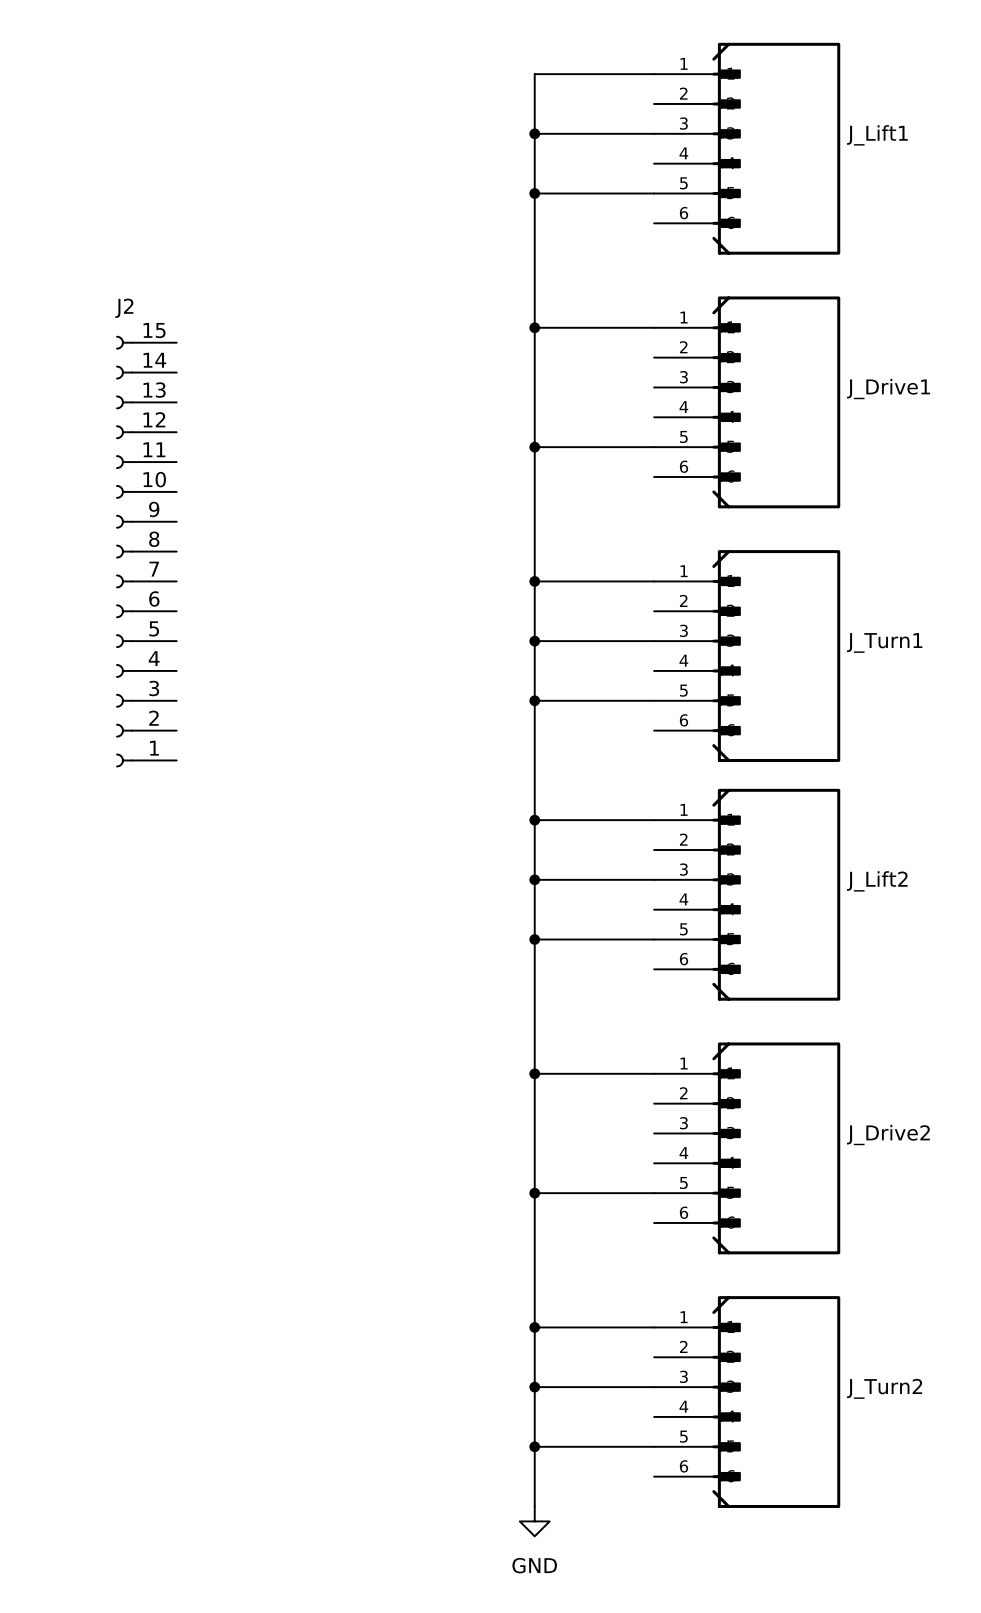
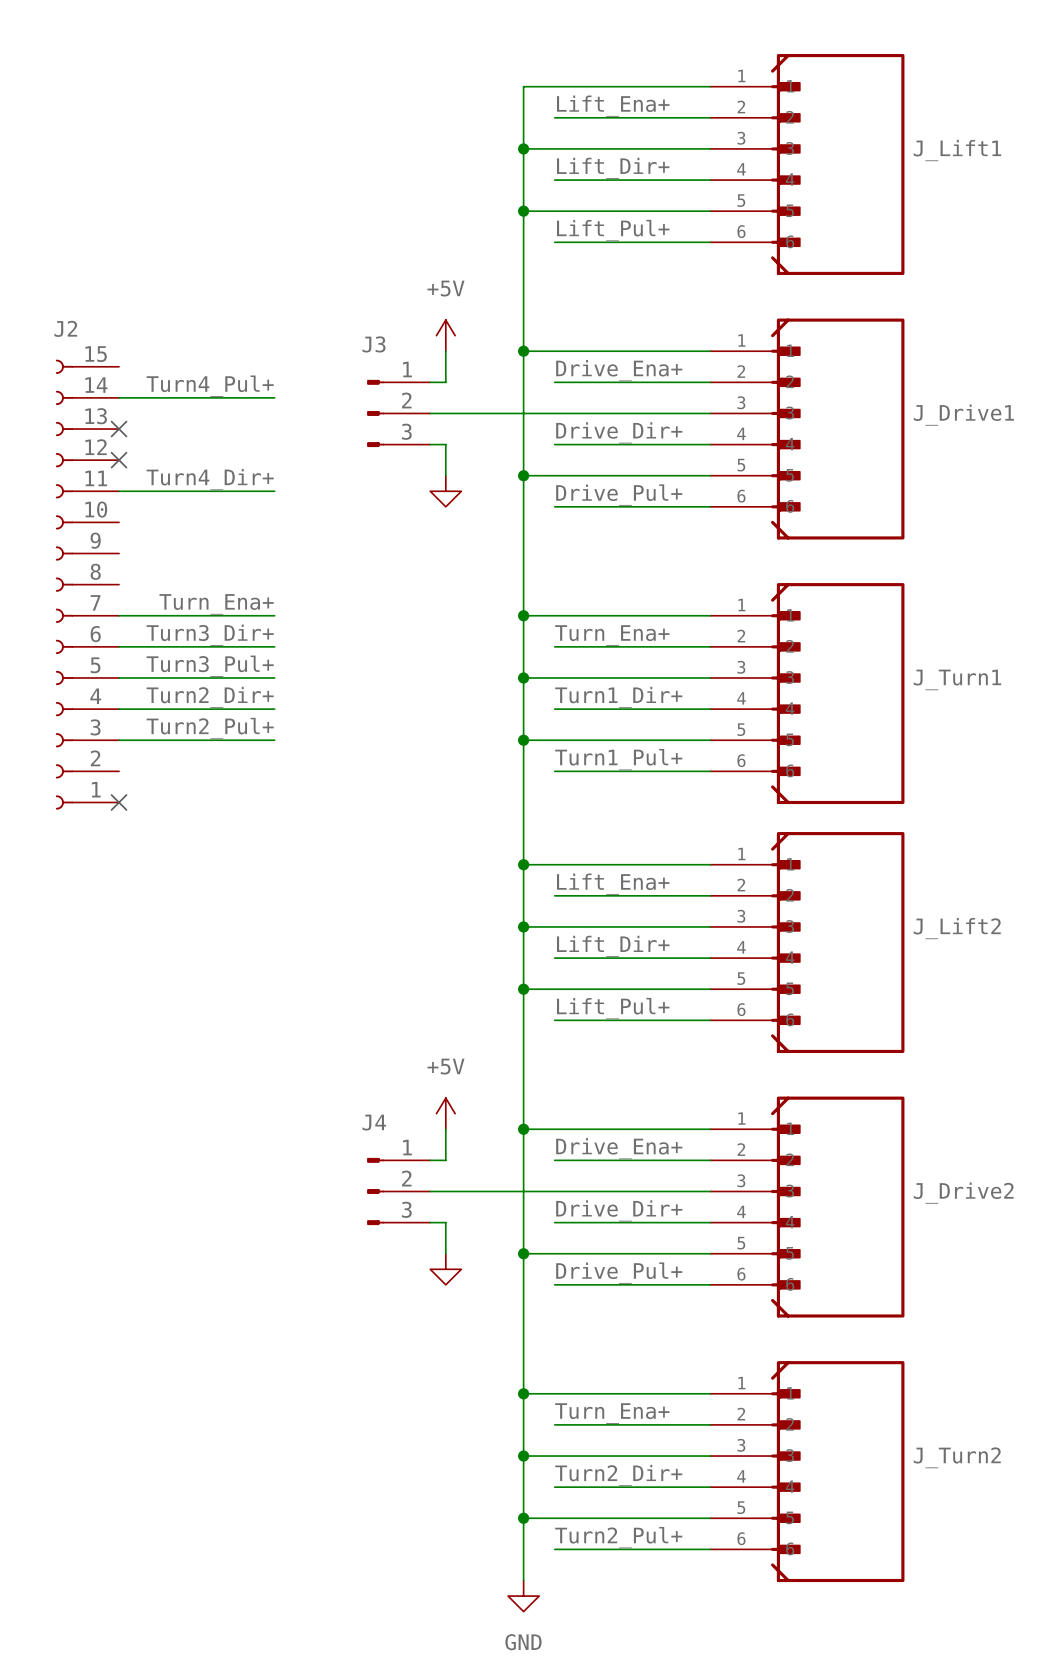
wire: (534, 74) (534, 1506) -> (585, 86) (523, 86) (523, 1580)
label: none -> Lift_Ena+ (613, 106)
wire: none -> (554, 117) (710, 117)
wire: none -> (523, 148) (585, 148)
junction: none -> (523, 148)
junction: (534, 133) -> none
label: none -> Lift_Dir+ (613, 168)
wire: none -> (554, 180) (710, 180)
wire: none -> (523, 211) (585, 211)
junction: none -> (523, 211)
junction: (534, 193) -> none
label: none -> Lift_Pul+ (613, 230)
wire: none -> (554, 242) (710, 242)
power symbol: none -> +5V (445, 335)
wire: none -> (445, 351) (445, 382) (430, 382)
wire: none -> (523, 351) (585, 351)
junction position: (534, 327) -> (523, 351)
label: none -> Drive_Ena+ (619, 370)
wire: none -> (554, 382) (710, 382)
label: none -> Turn4_Pul+ (210, 386)
wire: none -> (119, 397) (274, 397)
J3: none -> (398, 413)
wire: none -> (430, 413) (710, 413)
no-connect mark: none -> (119, 429)
label: none -> Drive_Dir+ (619, 432)
wire: none -> (430, 444) (445, 444) (445, 475)
wire: none -> (554, 444) (710, 444)
no-connect mark: none -> (119, 460)
wire: none -> (523, 475) (585, 475)
junction position: (534, 447) -> (523, 475)
label: none -> Turn4_Dir+ (210, 479)
wire: none -> (119, 491) (274, 491)
power symbol: none -> (445, 491)
label: none -> Drive_Pul+ (619, 495)
wire: none -> (554, 506) (710, 506)
J2 position: (146, 551) -> (87, 584)
label: none -> Turn_Ena+ (216, 604)
wire: none -> (119, 615) (274, 615)
wire: none -> (523, 615) (585, 615)
junction: none -> (523, 615)
junction: (534, 581) -> none
label: none -> Turn3_Dir+ (210, 635)
label: none -> Turn_Ena+ (612, 635)
wire: none -> (119, 646) (274, 646)
wire: none -> (554, 646) (710, 646)
label: none -> Turn3_Pul+ (210, 666)
wire: none -> (119, 677) (274, 677)
wire: none -> (523, 677) (585, 677)
junction: none -> (523, 677)
junction: (534, 641) -> none
label: none -> Turn2_Dir+ (210, 697)
label: none -> Turn1_Dir+ (618, 697)
wire: none -> (119, 709) (274, 709)
wire: none -> (554, 709) (710, 709)
label: none -> Turn2_Pul+ (210, 728)
wire: none -> (119, 740) (274, 740)
wire: none -> (523, 740) (585, 740)
junction: none -> (523, 740)
junction: (534, 700) -> none
label: none -> Turn1_Pul+ (618, 759)
wire: none -> (554, 771) (710, 771)
no-connect mark: none -> (119, 802)
wire: none -> (523, 864) (585, 864)
junction: none -> (523, 864)
junction: (534, 820) -> none
label: none -> Lift_Ena+ (613, 884)
wire: none -> (554, 895) (710, 895)
wire: none -> (523, 926) (585, 926)
junction: none -> (523, 926)
junction: (534, 879) -> none
label: none -> Lift_Dir+ (613, 946)
wire: none -> (554, 958) (710, 958)
wire: none -> (523, 989) (585, 989)
junction: none -> (523, 989)
junction: (534, 939) -> none
label: none -> Lift_Pul+ (613, 1008)
wire: none -> (554, 1020) (710, 1020)
power symbol: none -> +5V (445, 1113)
wire: none -> (445, 1129) (445, 1160) (430, 1160)
wire: none -> (523, 1129) (585, 1129)
junction position: (534, 1073) -> (523, 1129)
label: none -> Drive_Ena+ (619, 1148)
wire: none -> (554, 1160) (710, 1160)
J4: none -> (398, 1191)
wire: none -> (430, 1191) (710, 1191)
label: none -> Drive_Dir+ (619, 1210)
wire: none -> (430, 1222) (445, 1222) (445, 1253)
wire: none -> (554, 1222) (710, 1222)
wire: none -> (523, 1253) (585, 1253)
junction position: (534, 1193) -> (523, 1253)
power symbol: none -> (445, 1269)
label: none -> Drive_Pul+ (619, 1273)
wire: none -> (554, 1284) (710, 1284)
wire: none -> (523, 1393) (585, 1393)
junction: none -> (523, 1393)
junction: (534, 1327) -> none
label: none -> Turn_Ena+ (612, 1413)
wire: none -> (554, 1424) (710, 1424)
wire: none -> (523, 1456) (585, 1456)
junction: none -> (523, 1456)
junction: (534, 1387) -> none
label: none -> Turn2_Dir+ (618, 1475)
wire: none -> (554, 1487) (710, 1487)
wire: none -> (523, 1518) (585, 1518)
junction: none -> (523, 1518)
junction: (534, 1446) -> none
label: none -> Turn2_Pul+ (618, 1537)
wire: none -> (554, 1549) (710, 1549)
power symbol position: GND (534, 1521) -> GND (523, 1596)

